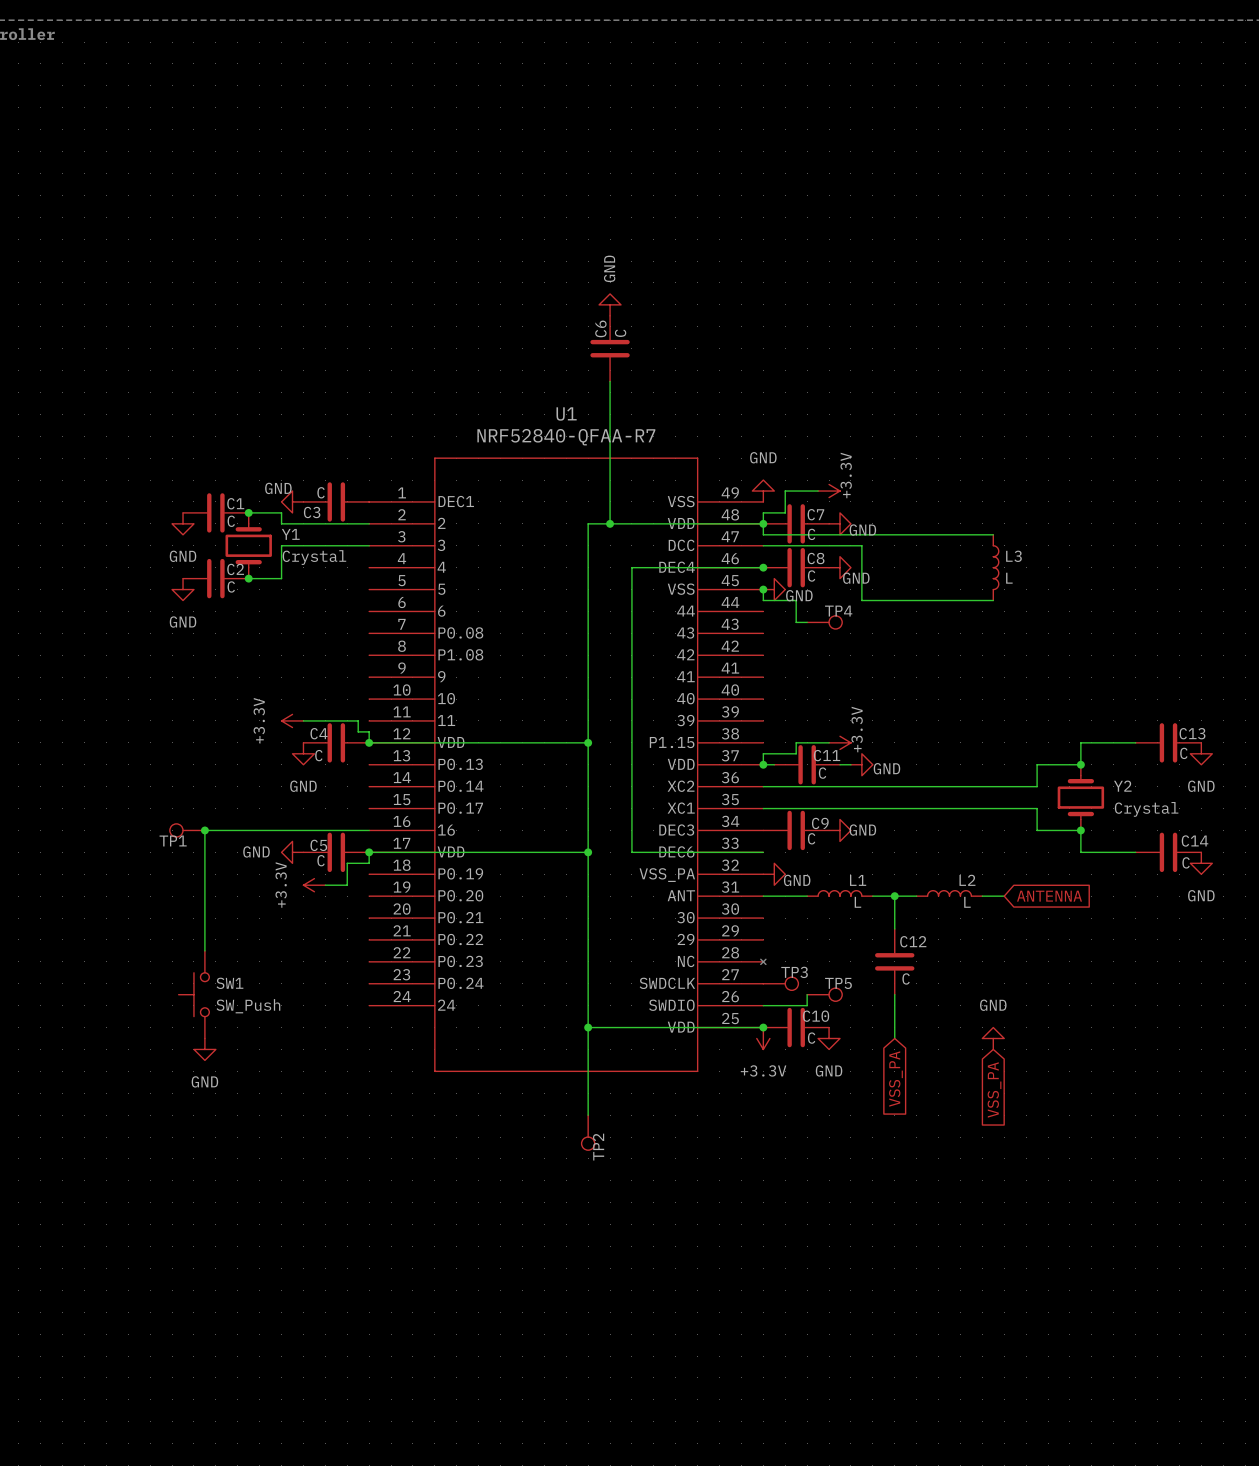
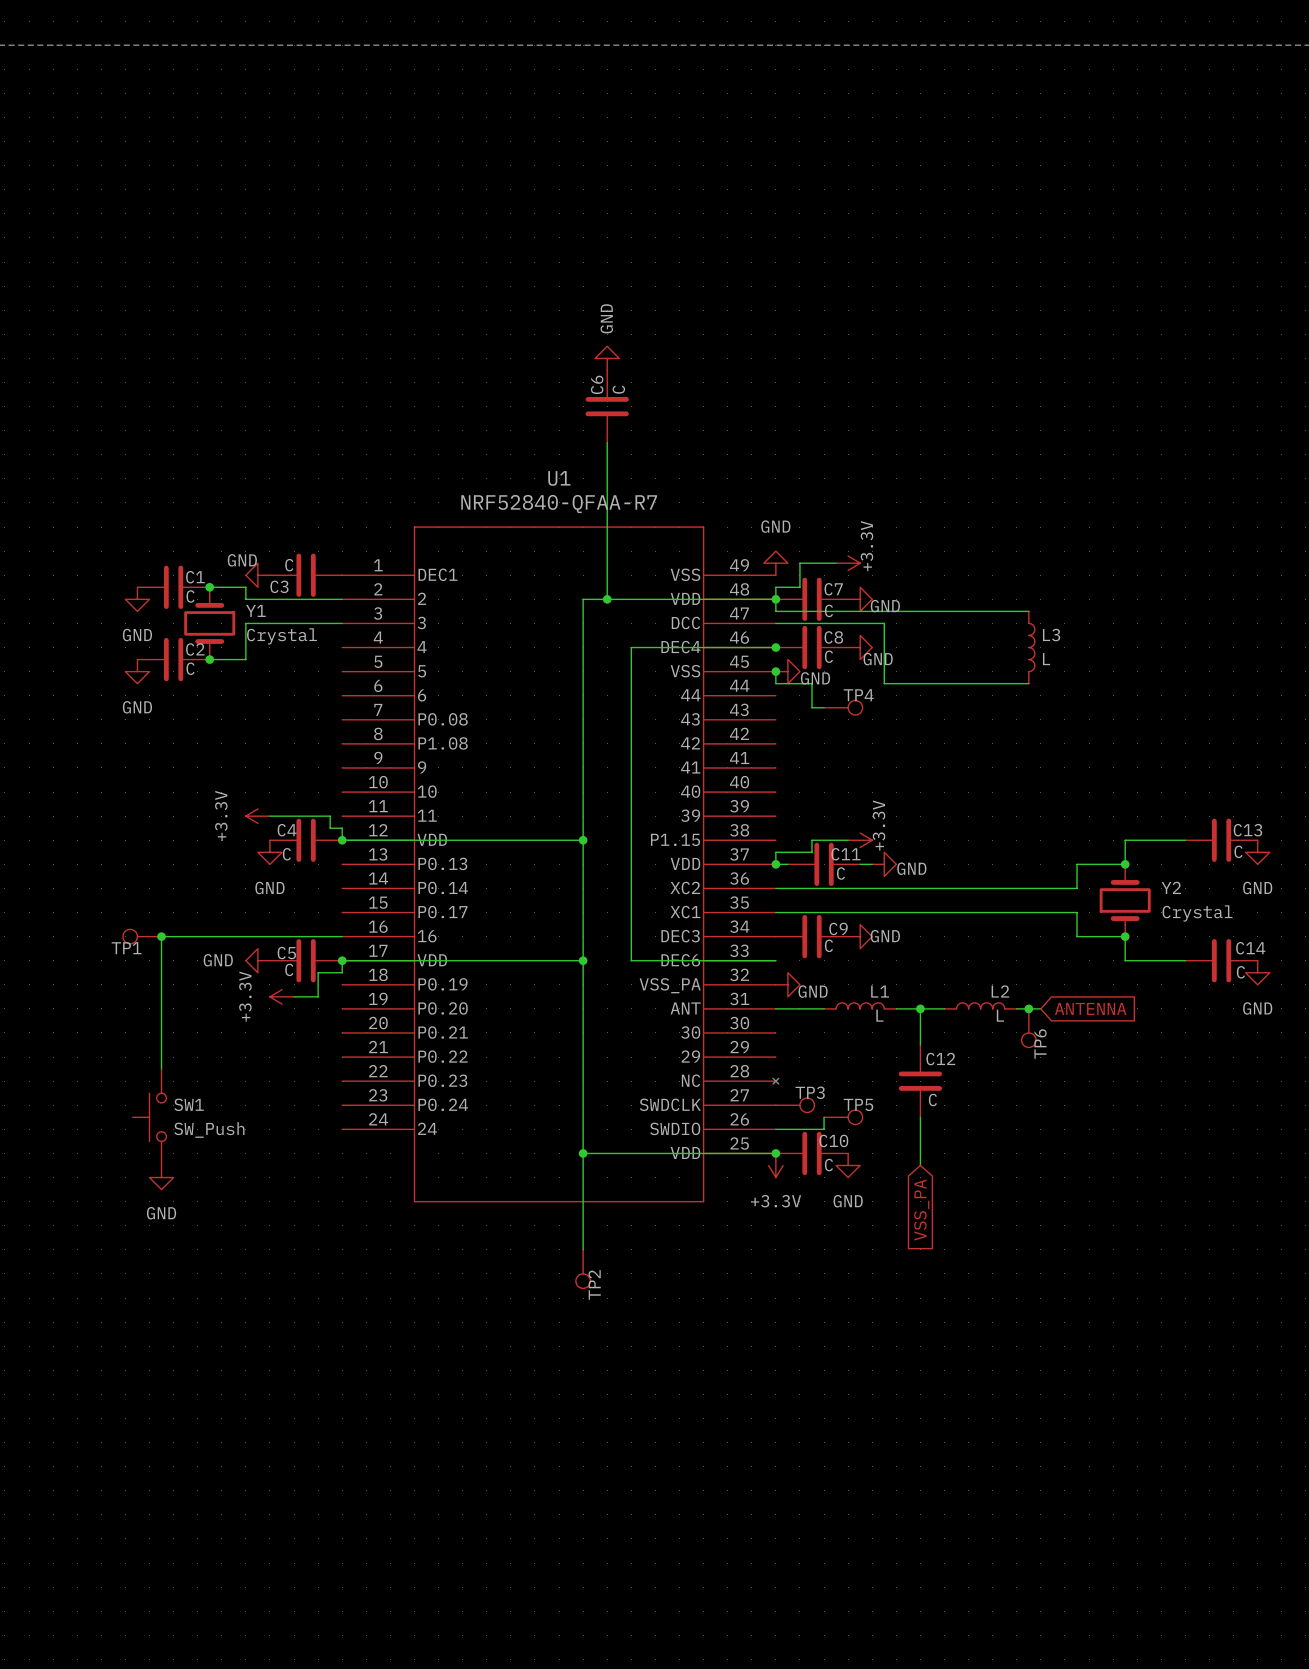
junction: none -> (1028, 1008)
TP6: none -> (1028, 1028)
power symbol: GND (993, 1038) -> none
global label: VSS_PA (994, 1089) -> none

